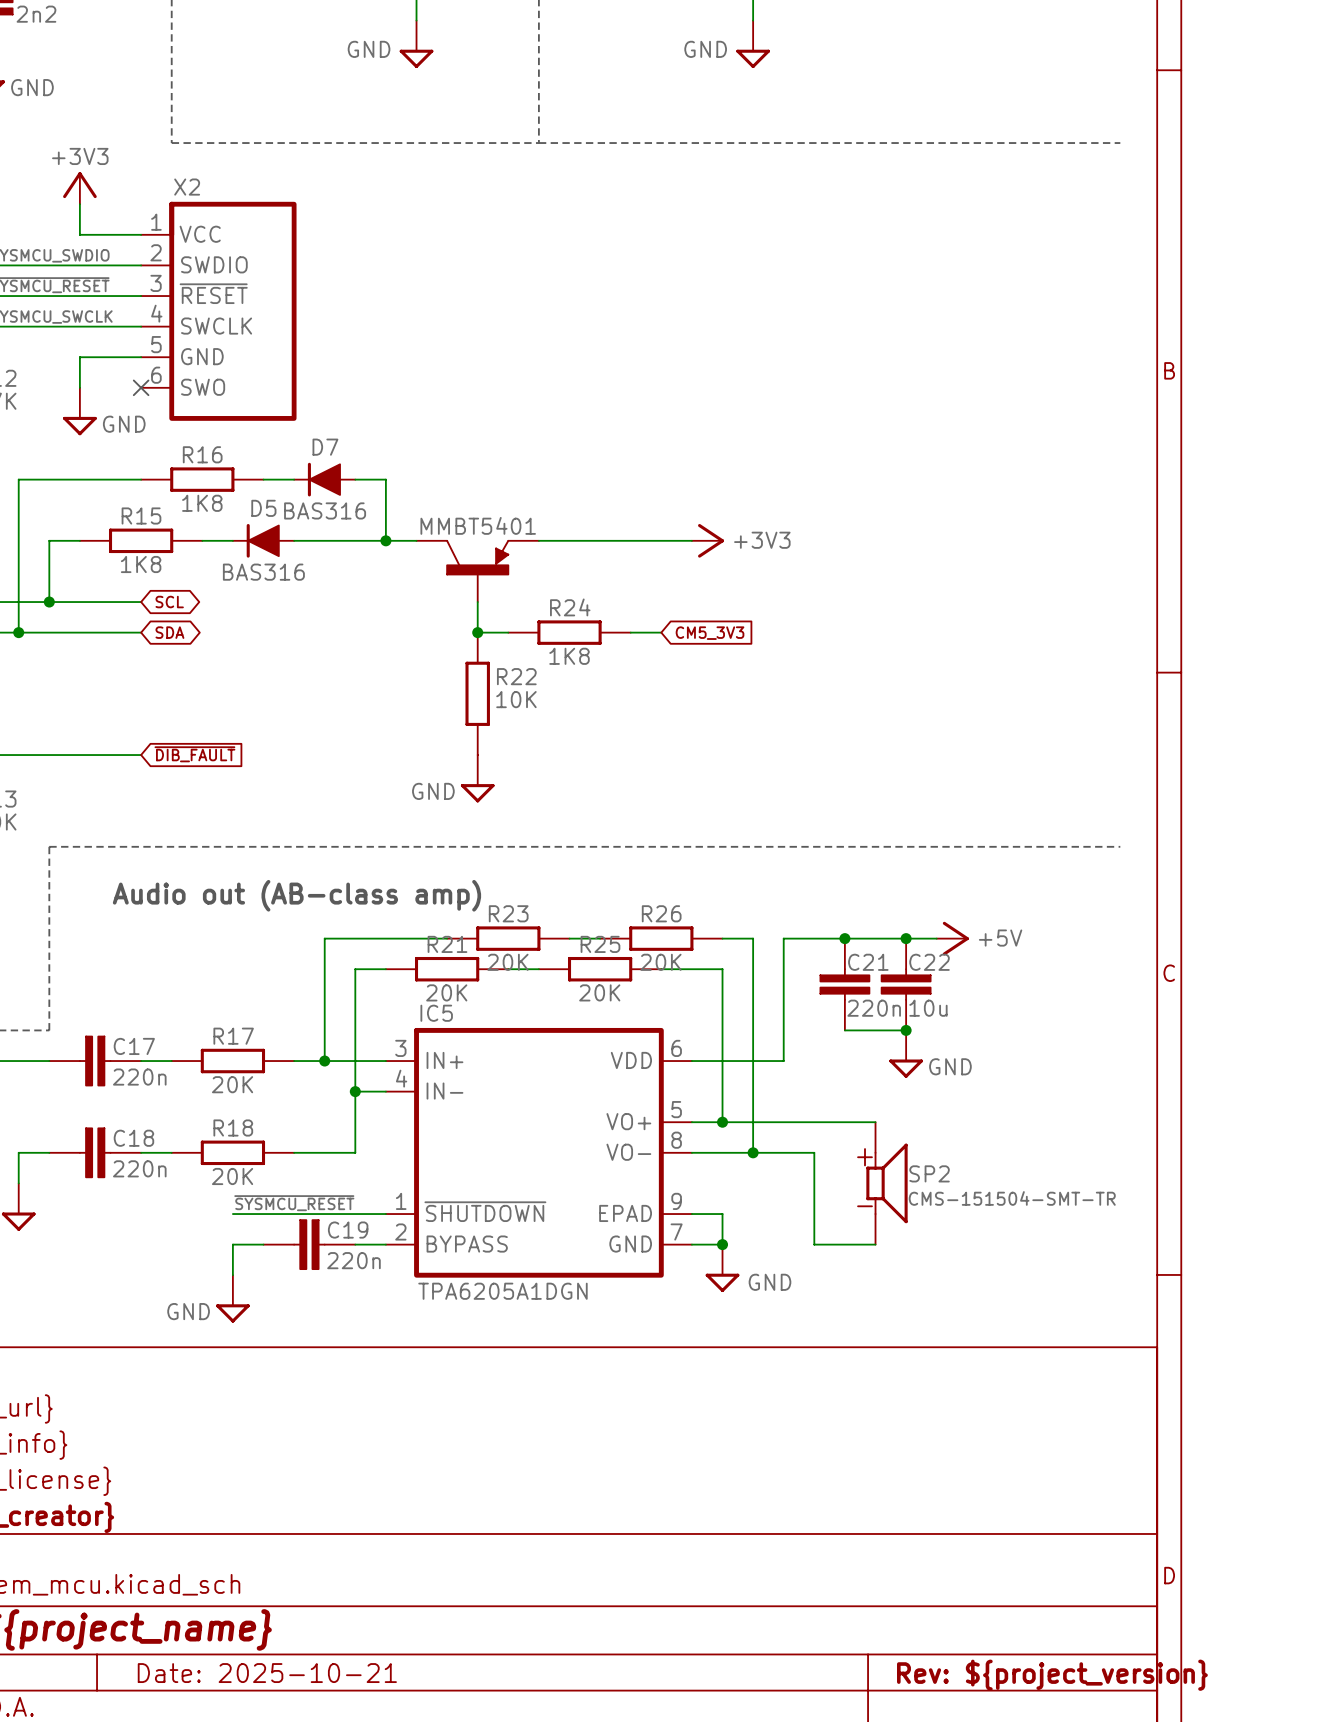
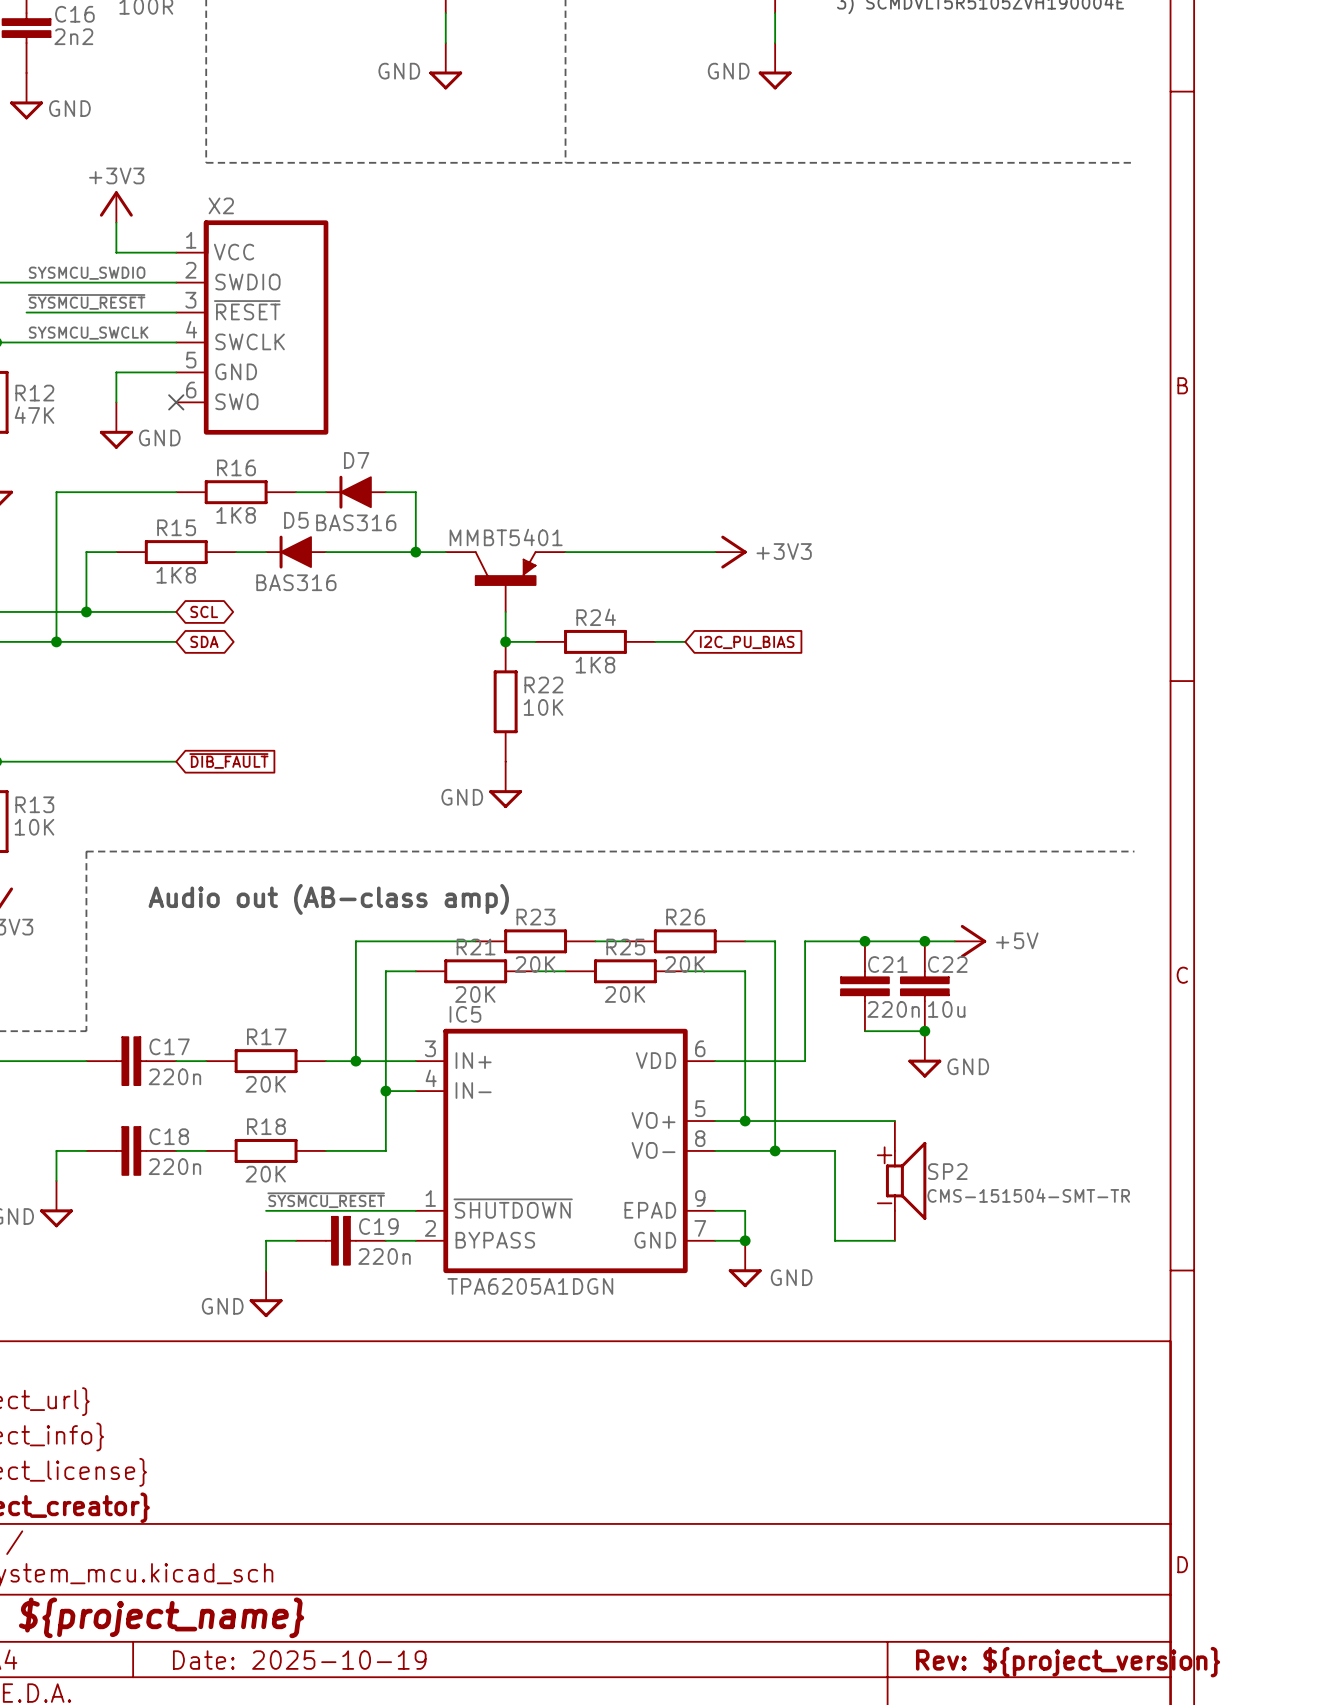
global label: CM5_3V3 (710, 633) -> I2C_PU_BIAS (747, 642)
title block: Date: 2025-10-21 (267, 1673) -> Date: 2025-10-19 (299, 1660)

